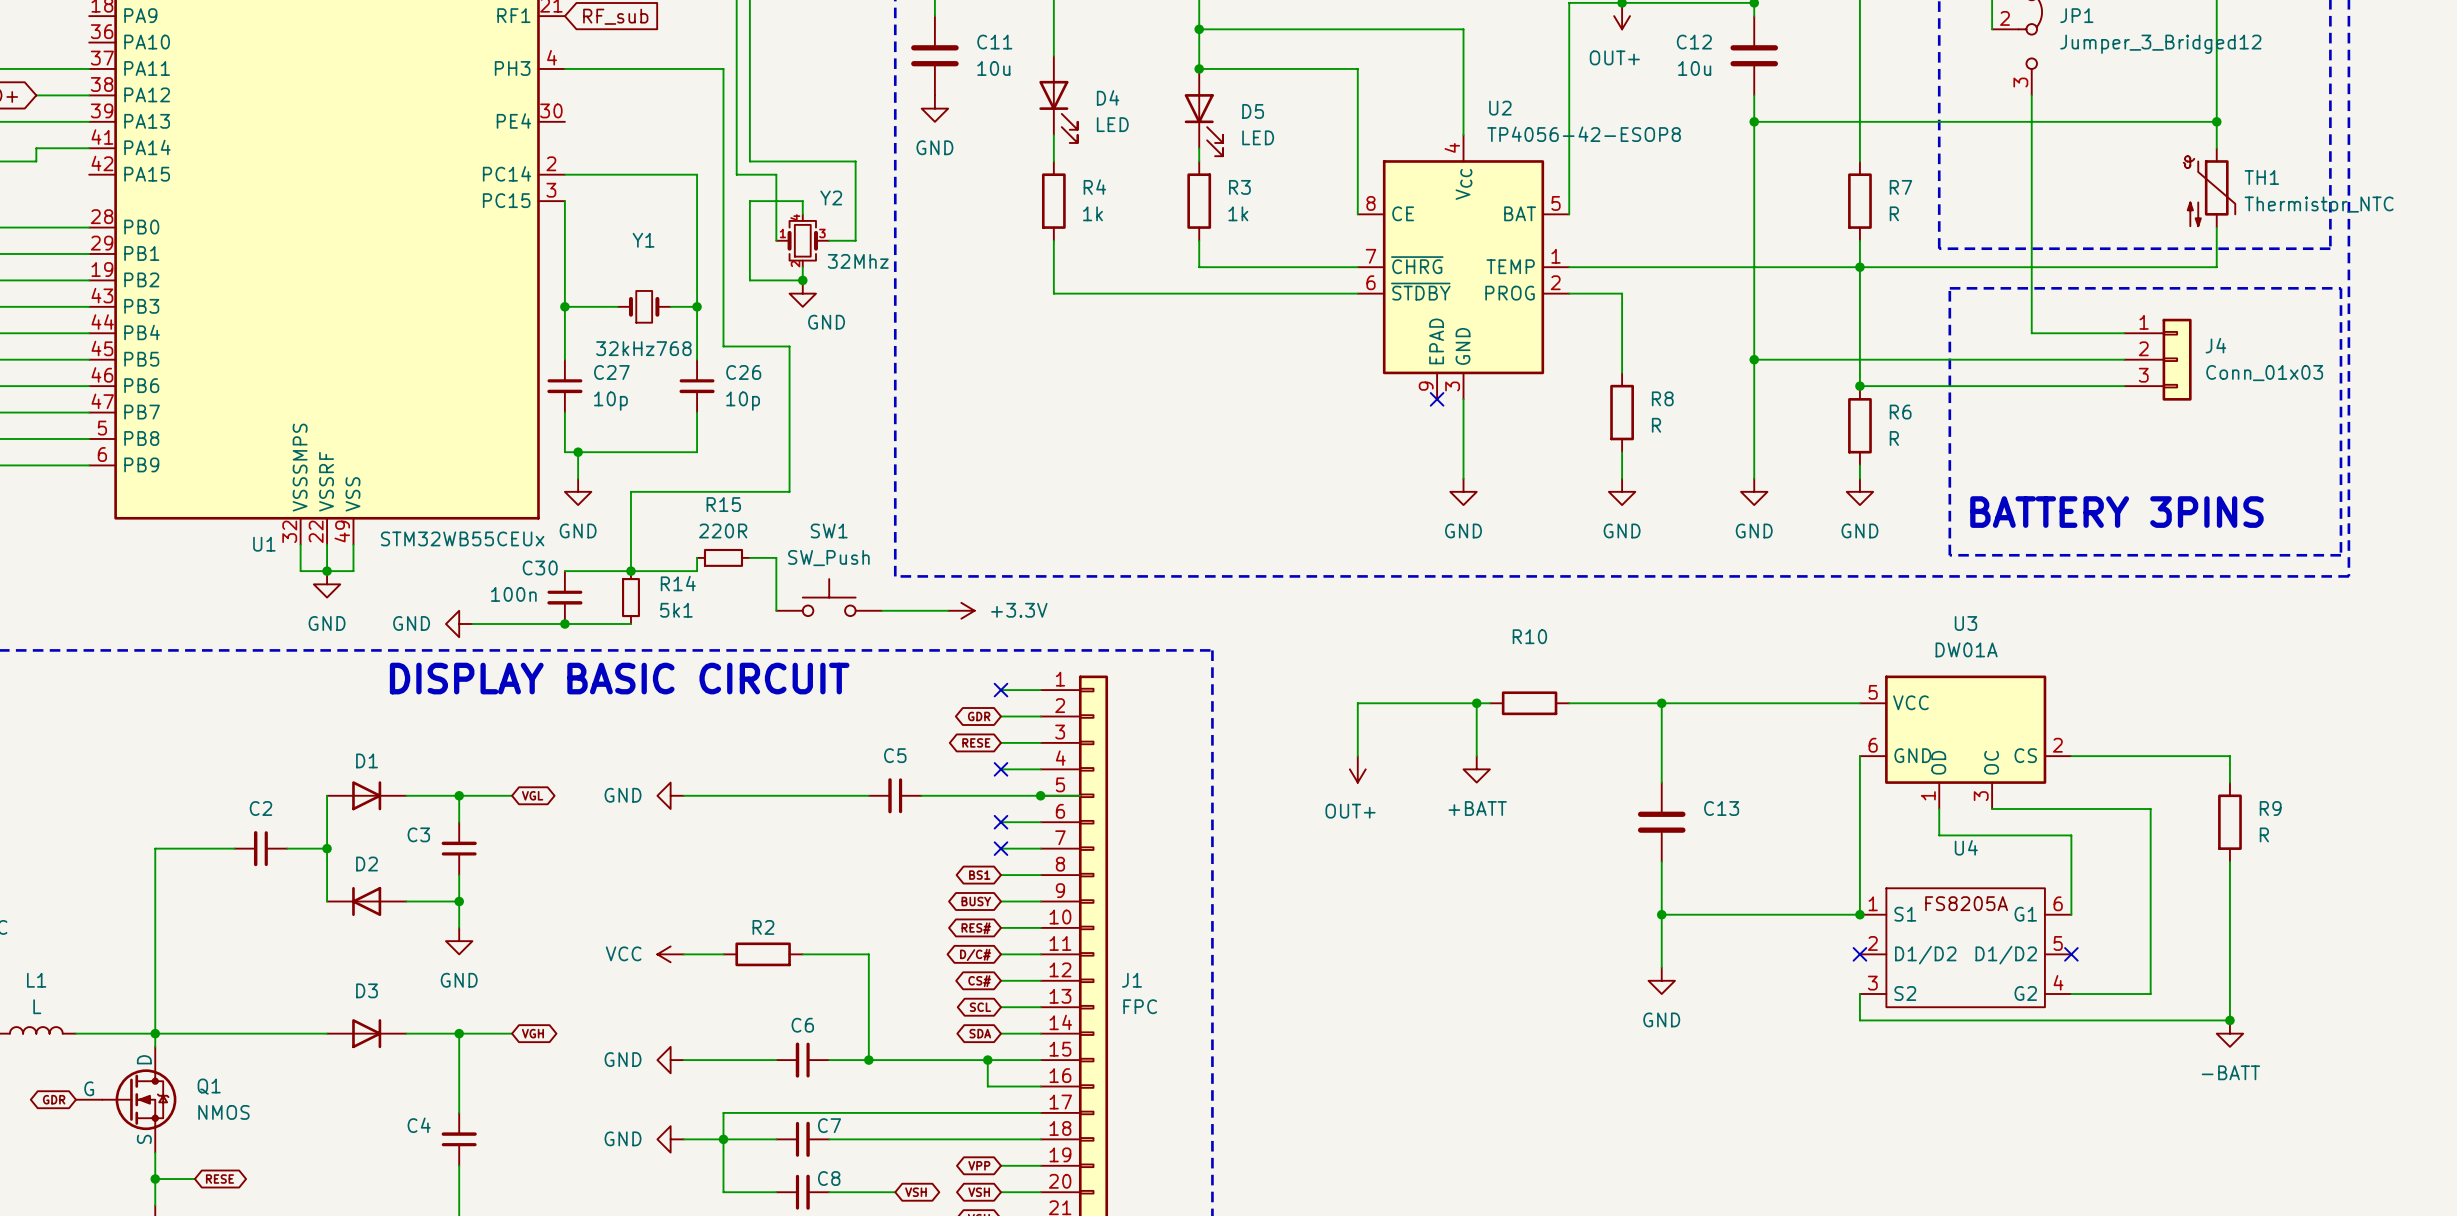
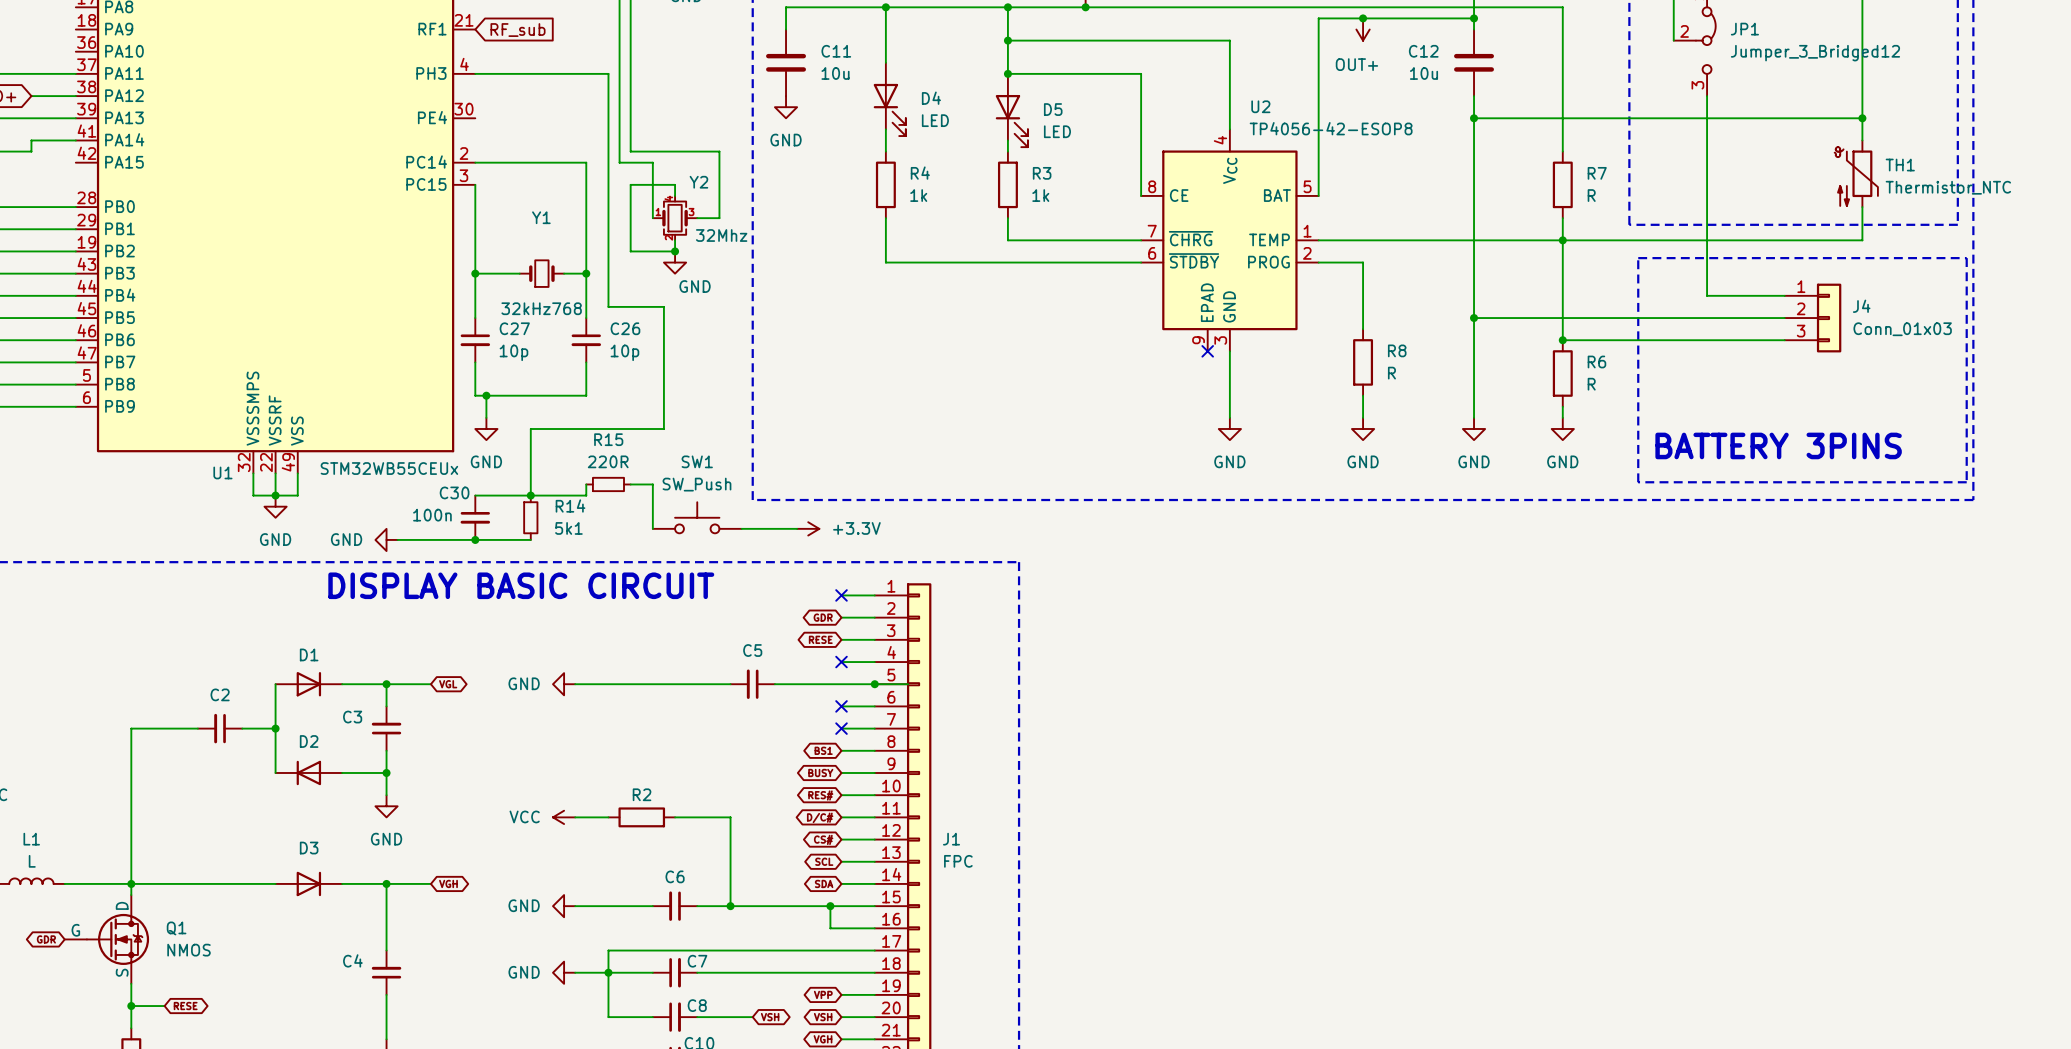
wire: (1476, 703) (1476, 756) -> none
junction: (1476, 703) -> none
wire: (1489, 703) (1357, 703) (1357, 756) -> none
R10: (1529, 703) -> none
wire: (1569, 703) (1859, 703) -> none
wire: (1661, 703) (1661, 782) -> none
junction: (1661, 703) -> none
U3: DW01A (1965, 742) -> none
wire: (1859, 756) (1859, 914) (1661, 914) -> none
wire: (2071, 756) (2229, 756) (2229, 782) -> none
power symbol: OUT+ (1357, 769) -> none
power symbol: +BATT (1476, 769) -> none
wire: (1939, 809) (1939, 835) (2071, 835) (2071, 914) -> none
wire: (1992, 809) (2150, 809) (2150, 994) (2071, 994) -> none
C13: (1661, 822) -> none
R9: R (2229, 822) -> none
wire: (1661, 861) (1661, 967) -> none
wire: (2229, 861) (2229, 1020) (1859, 1020) (1859, 994) -> none
junction: (1661, 914) -> none
junction: (1859, 914) -> none
U4: (1965, 947) -> none
no-connect mark: (1859, 954) -> none
no-connect mark: (2071, 954) -> none
power symbol: GND (1661, 980) -> none
junction: (2229, 1020) -> none
power symbol: -BATT (2229, 1033) -> none

